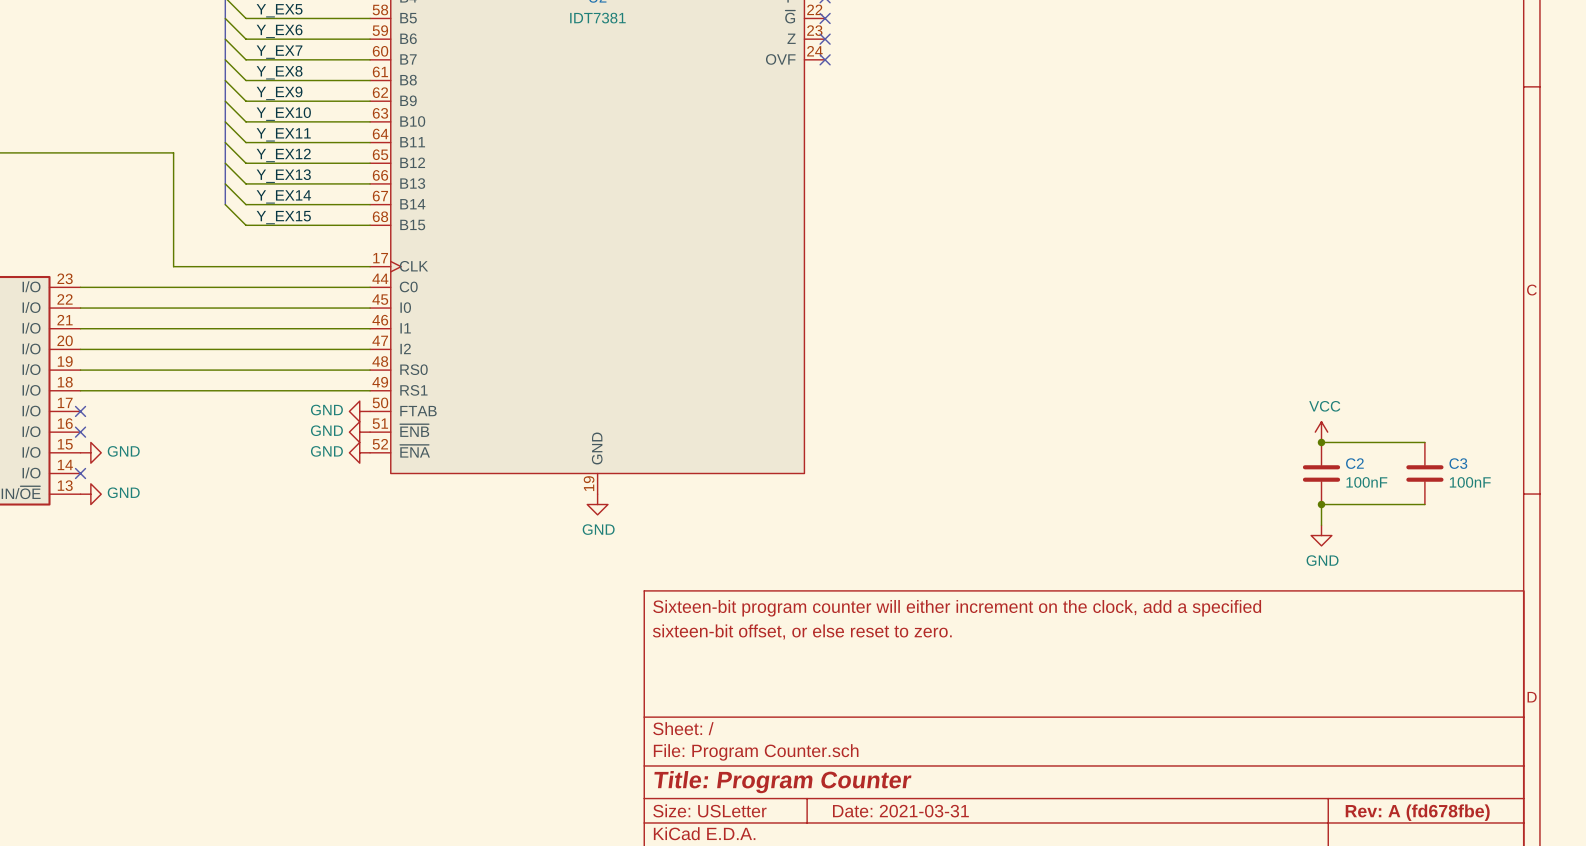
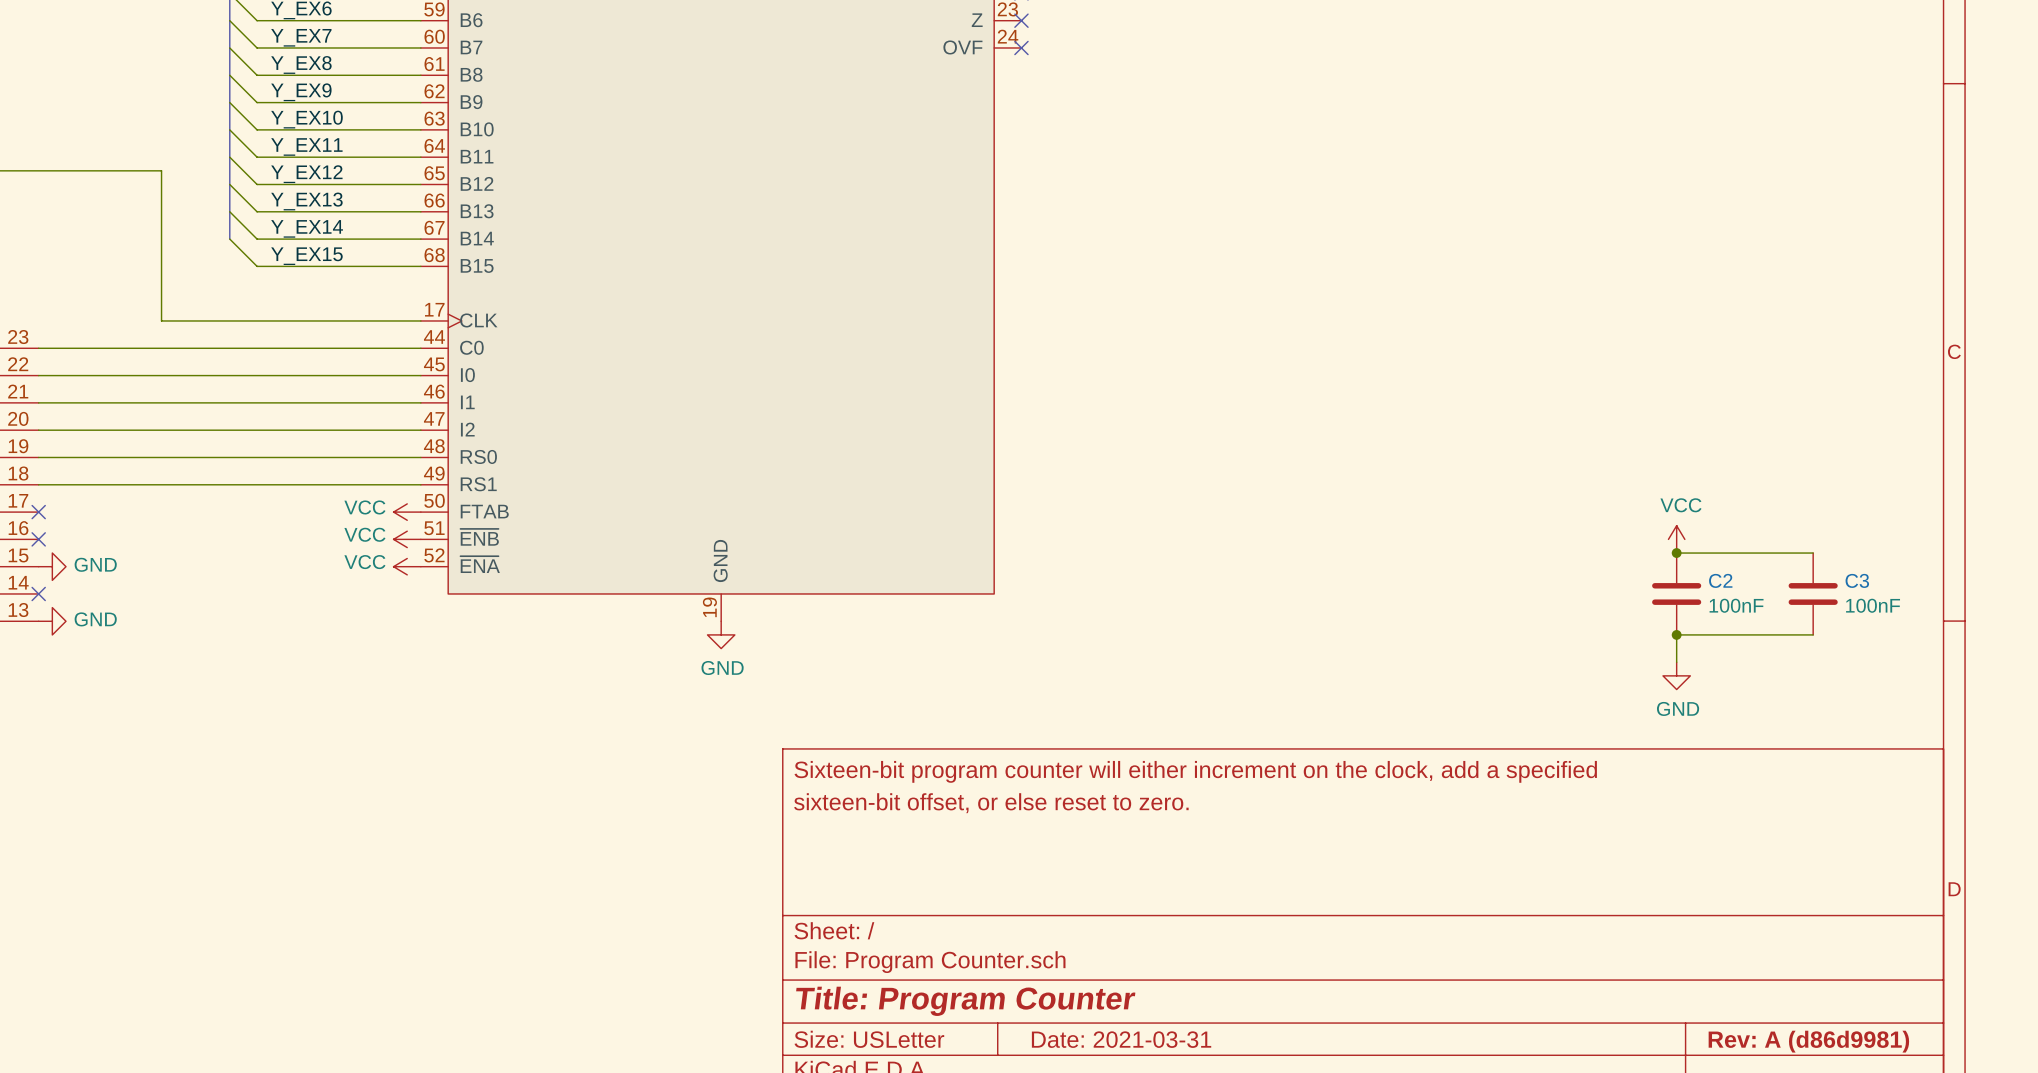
power symbol: GND (359, 411) -> VCC (407, 512)
power symbol: GND (359, 432) -> VCC (407, 539)
power symbol: GND (359, 452) -> VCC (407, 566)
title block: Rev: A (fd678fbe) (1417, 812) -> Rev: A (d86d9981) (1808, 1041)

